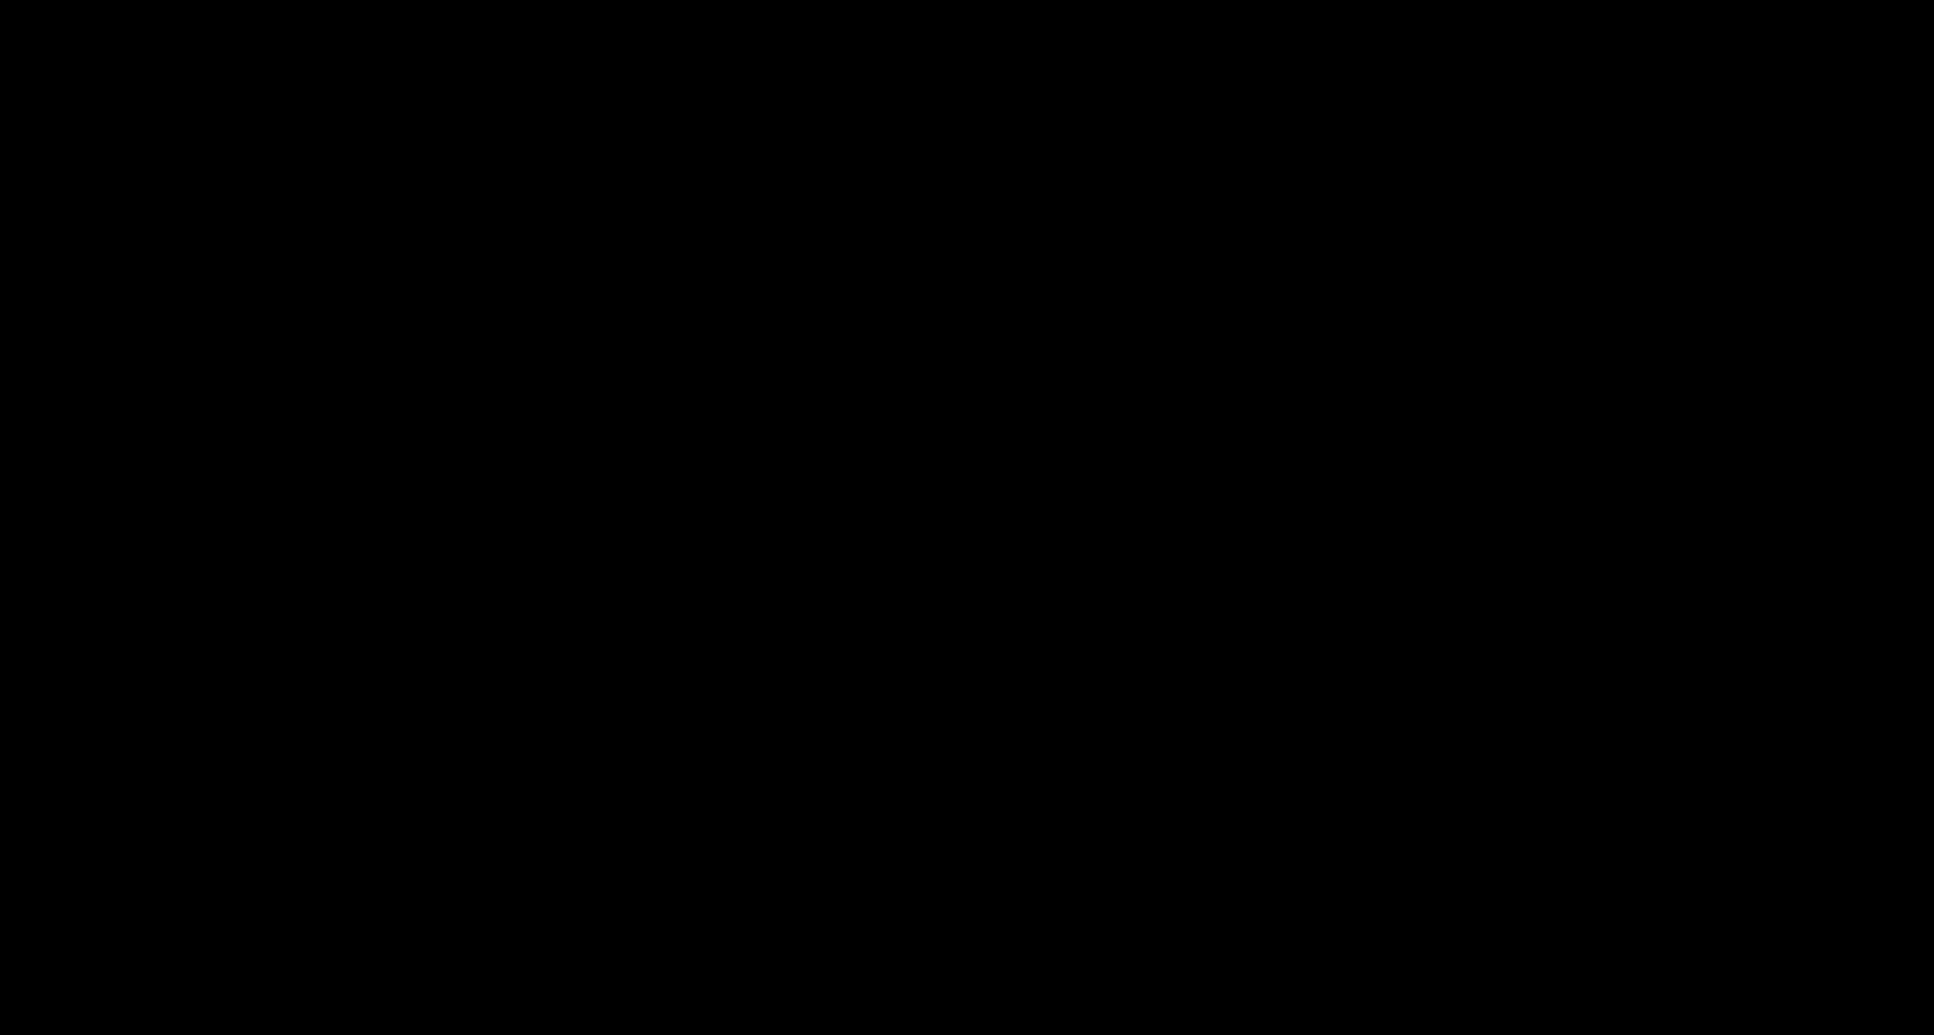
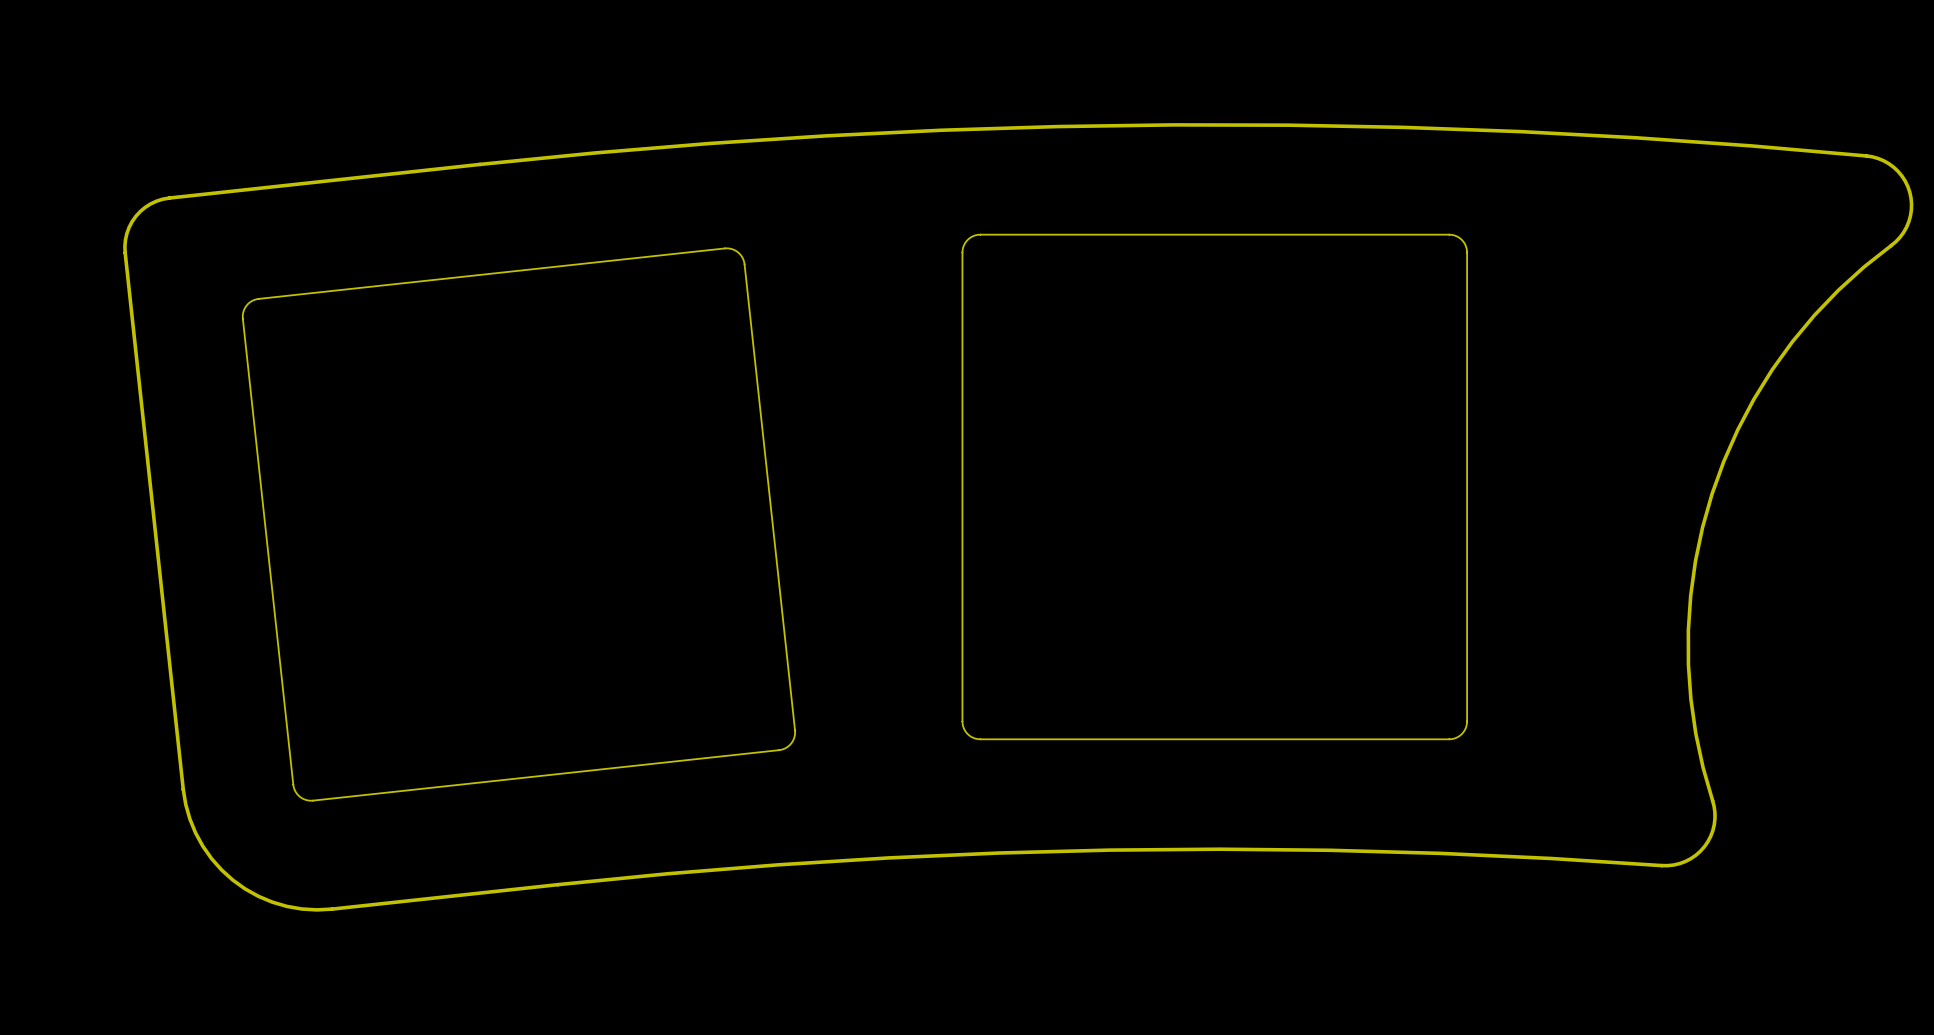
board edge: none -> (1866, 155) (1635, 137) (1404, 127) (1173, 124) (1057, 126) (825, 135) (595, 152) (169, 198) (156, 201) (145, 207) (132, 221) (125, 239) (125, 252) (183, 789) (189, 818) (202, 846) (211, 858) (232, 880) (245, 888) (272, 902) (301, 908) (316, 909) (667, 873) (888, 857) (998, 853) (1219, 849) (1330, 850) (1440, 853) (1661, 865) (1685, 861) (1704, 846) (1712, 830) (1714, 818) (1714, 806) (1695, 733) (1688, 664) (1690, 595) (1702, 527) (1723, 461) (1753, 399) (1772, 369) (1814, 315) (1864, 266) (1895, 241) (1906, 227) (1911, 204) (1905, 181) (1889, 163) (1866, 155)
drawing: none -> [961, 233, 1468, 741]
drawing: none -> [241, 247, 797, 802]

